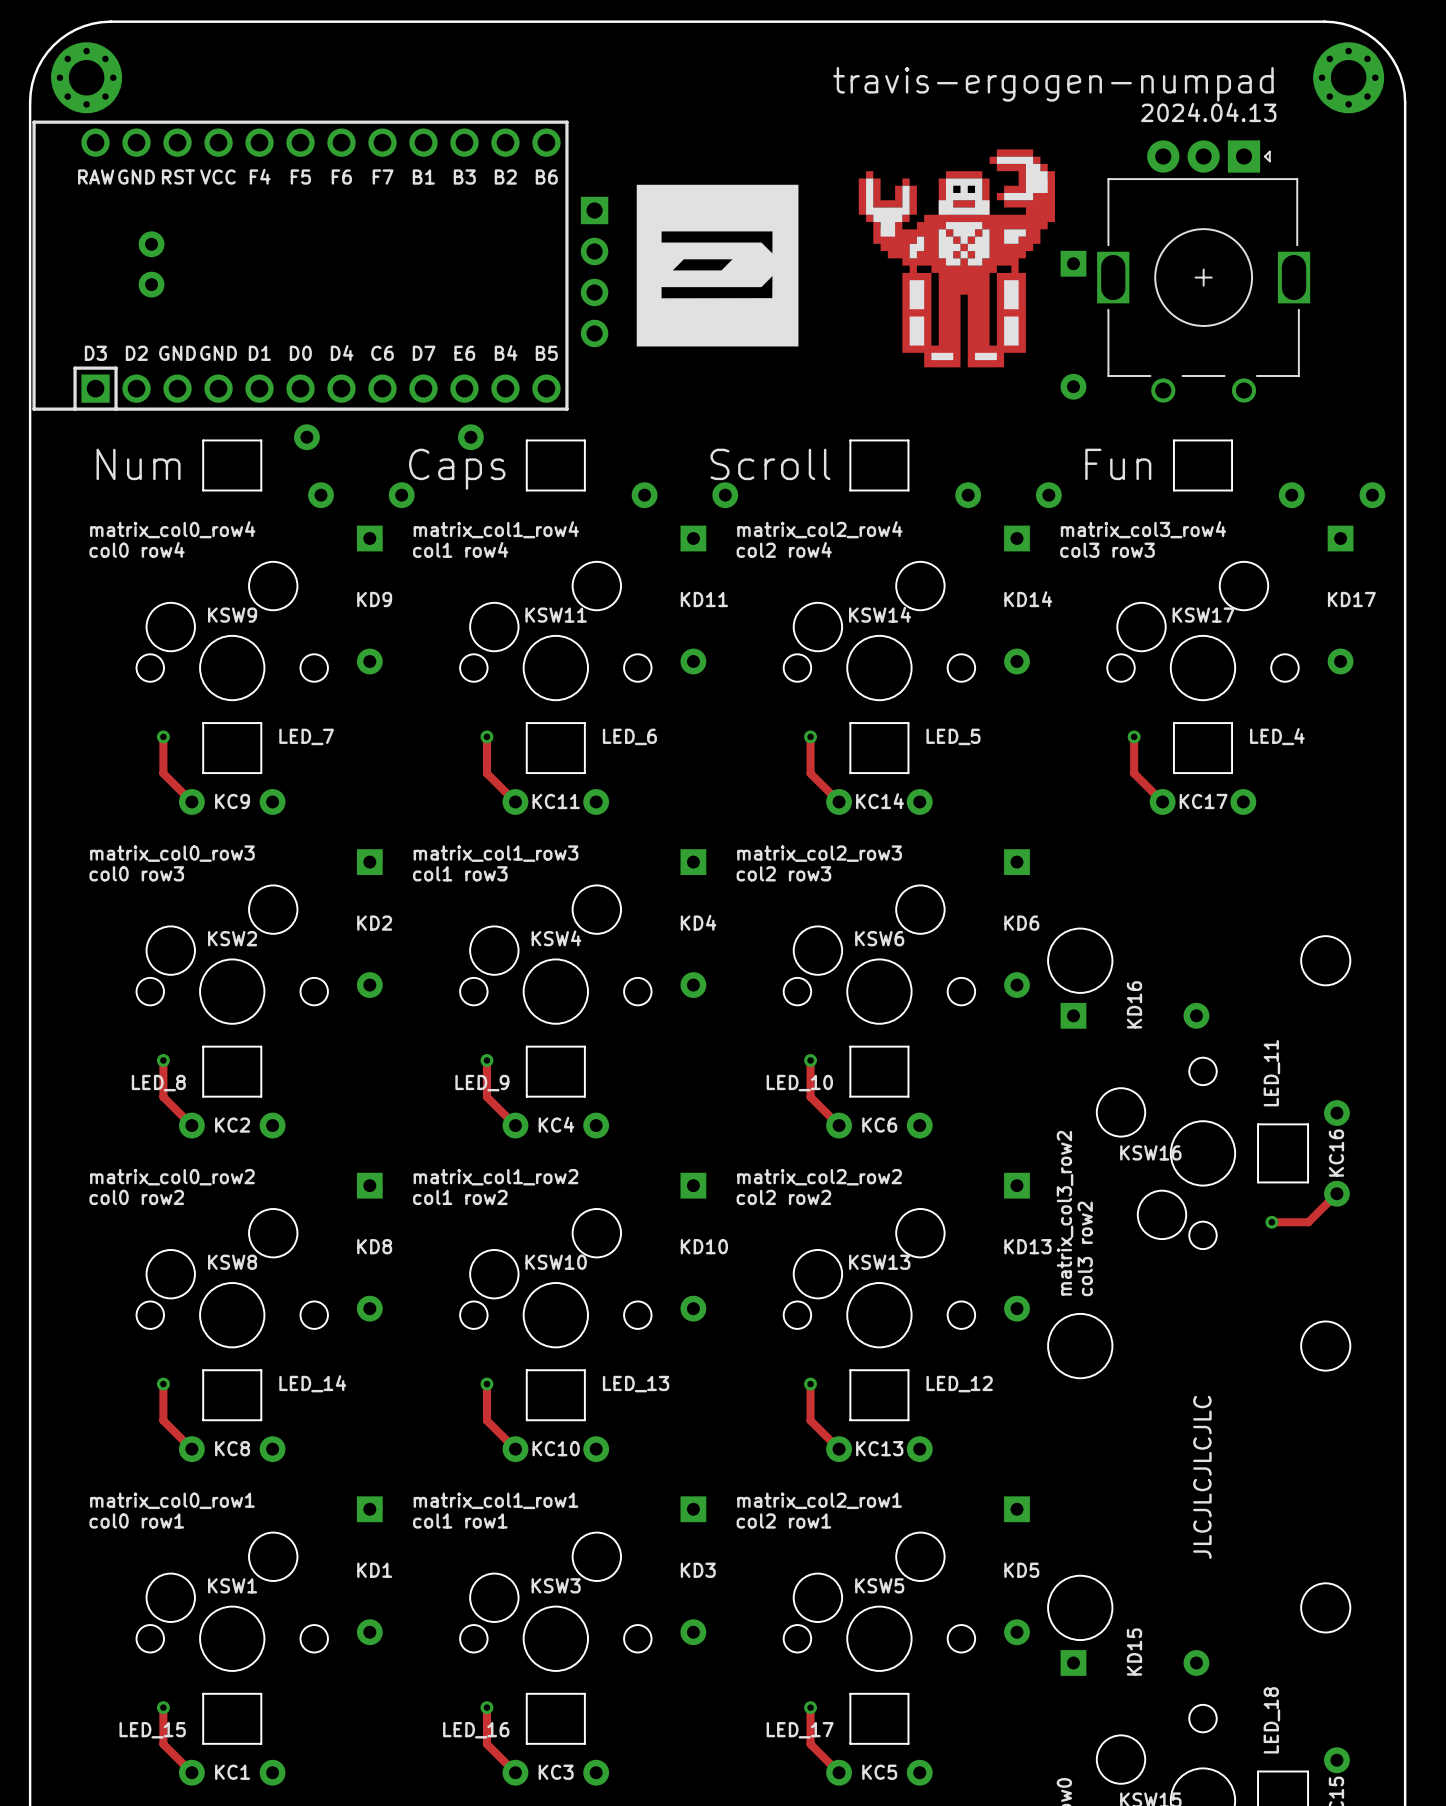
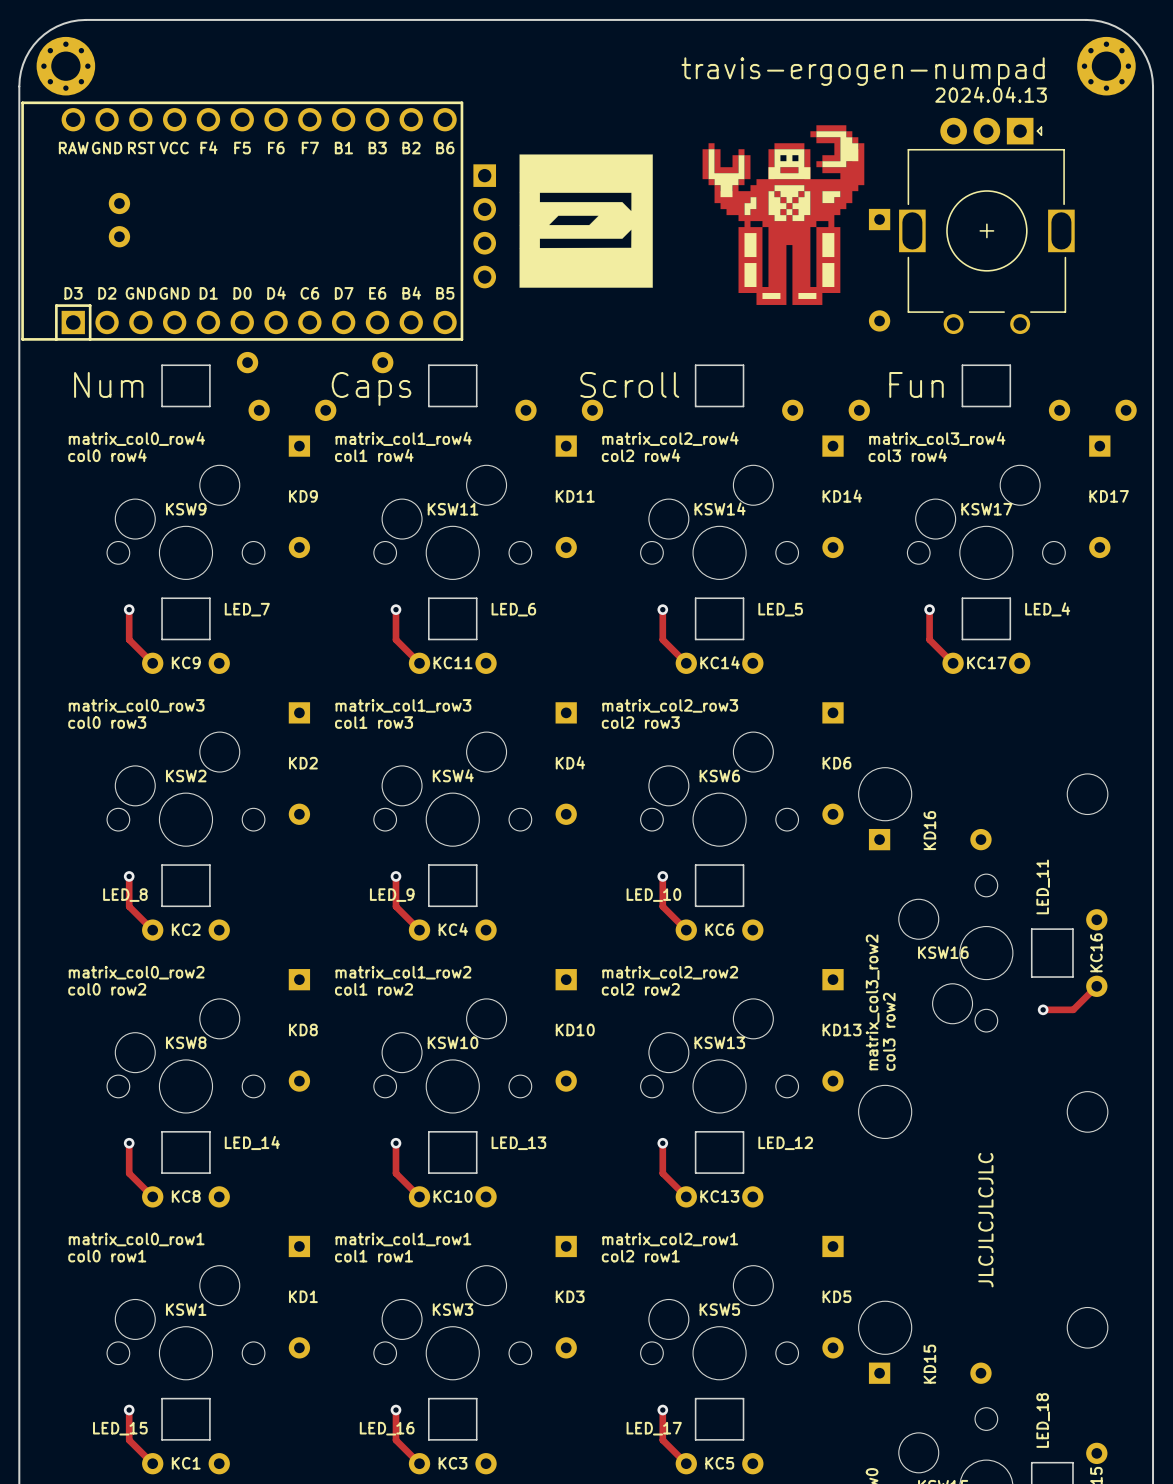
text: col3 row3 (1107, 550) -> col3 row4 (907, 455)

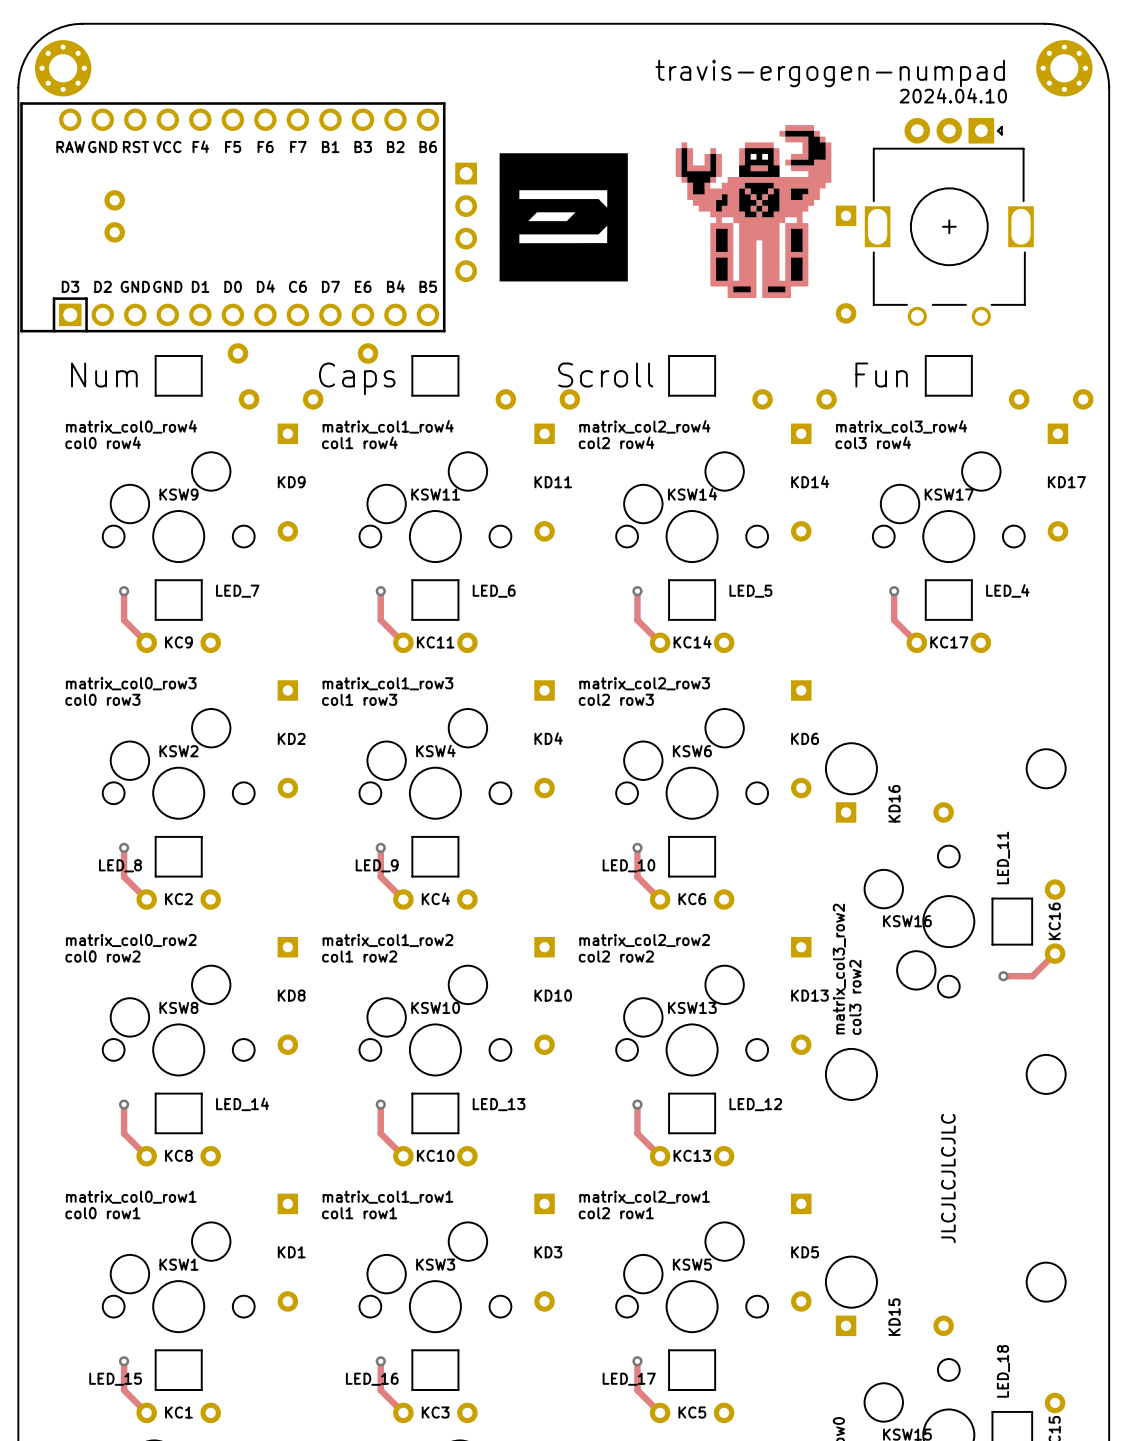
text: 2024.04.13 (991, 94) -> 2024.04.10 (953, 95)

